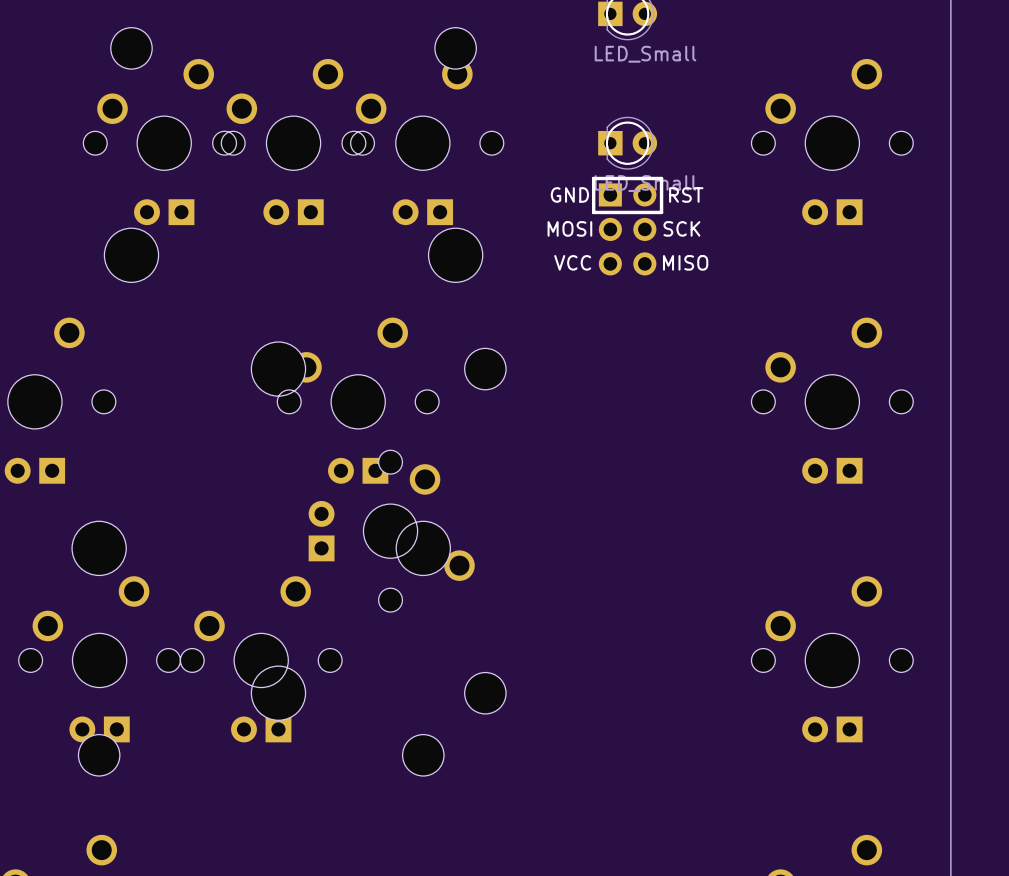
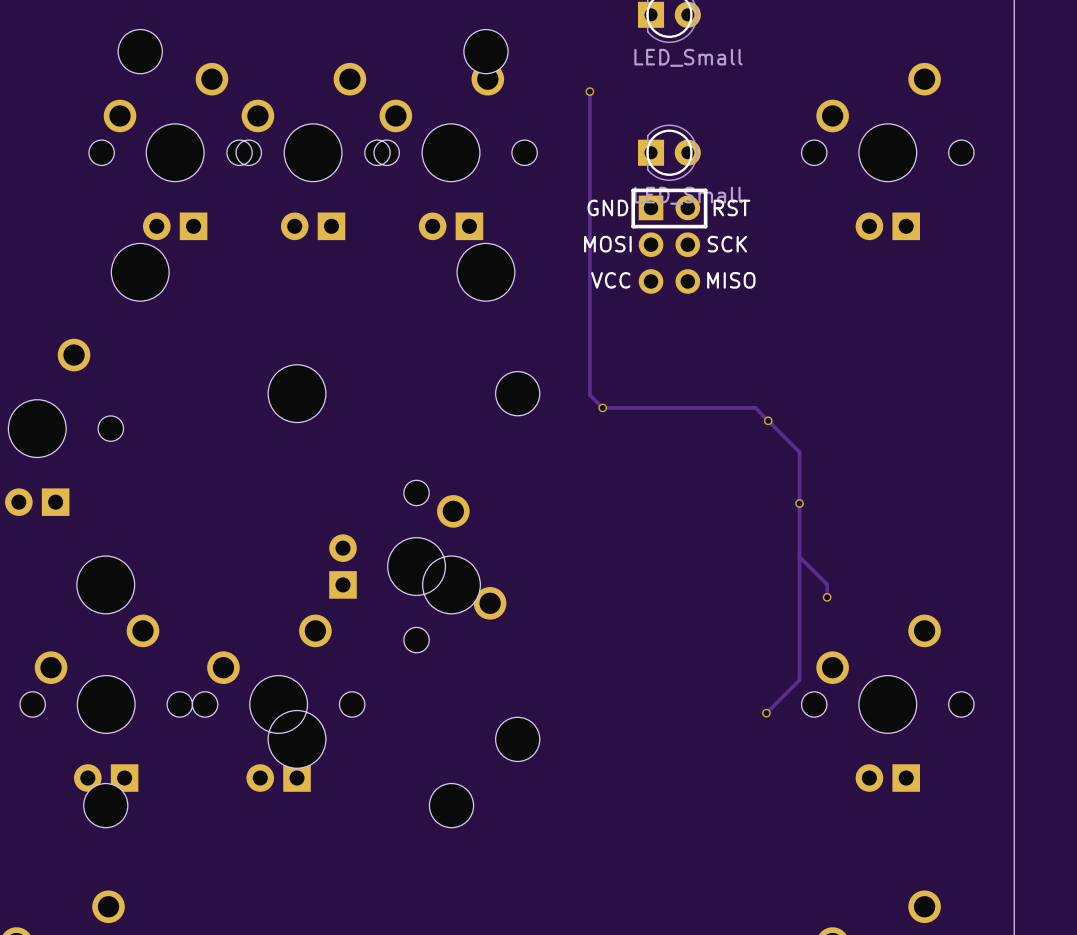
track: none -> (589, 91) (589, 395) (602, 407) (755, 407) (799, 452) (799, 680) (766, 713)
via: none -> (589, 91)
via: none -> (602, 407)
via: none -> (768, 420)
part: (358, 400) -> none
part: (832, 400) -> none
via: none -> (799, 503)
track: none -> (799, 556) (827, 584) (827, 597)
via: none -> (827, 597)
via: none -> (766, 713)

